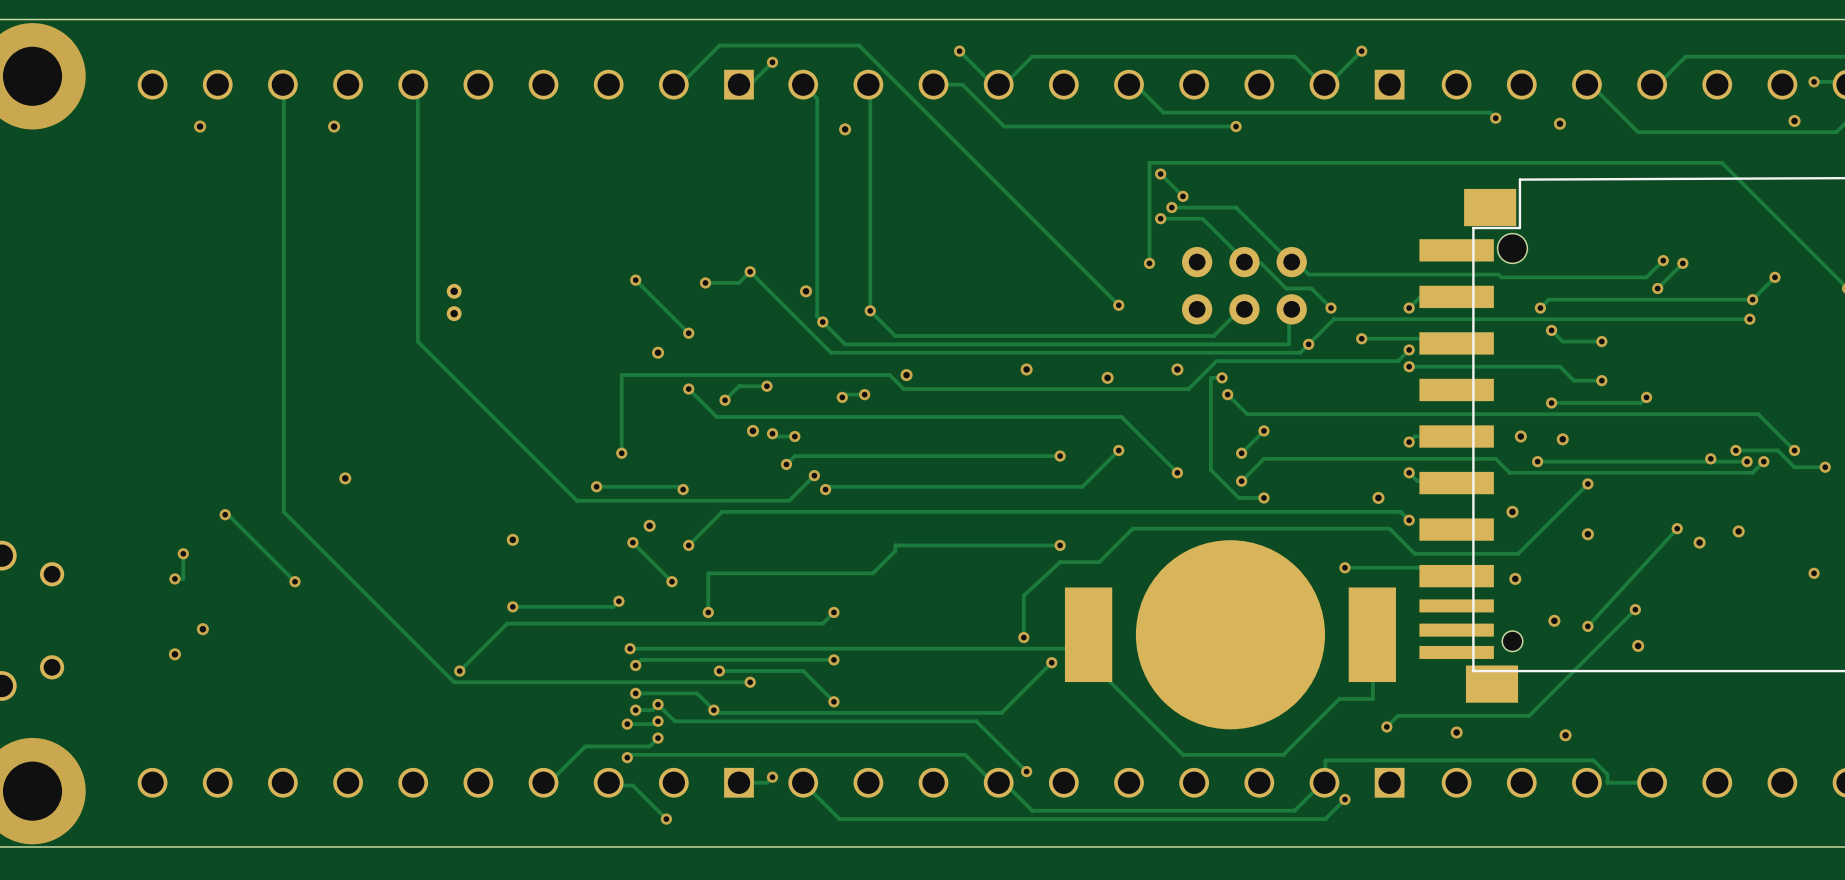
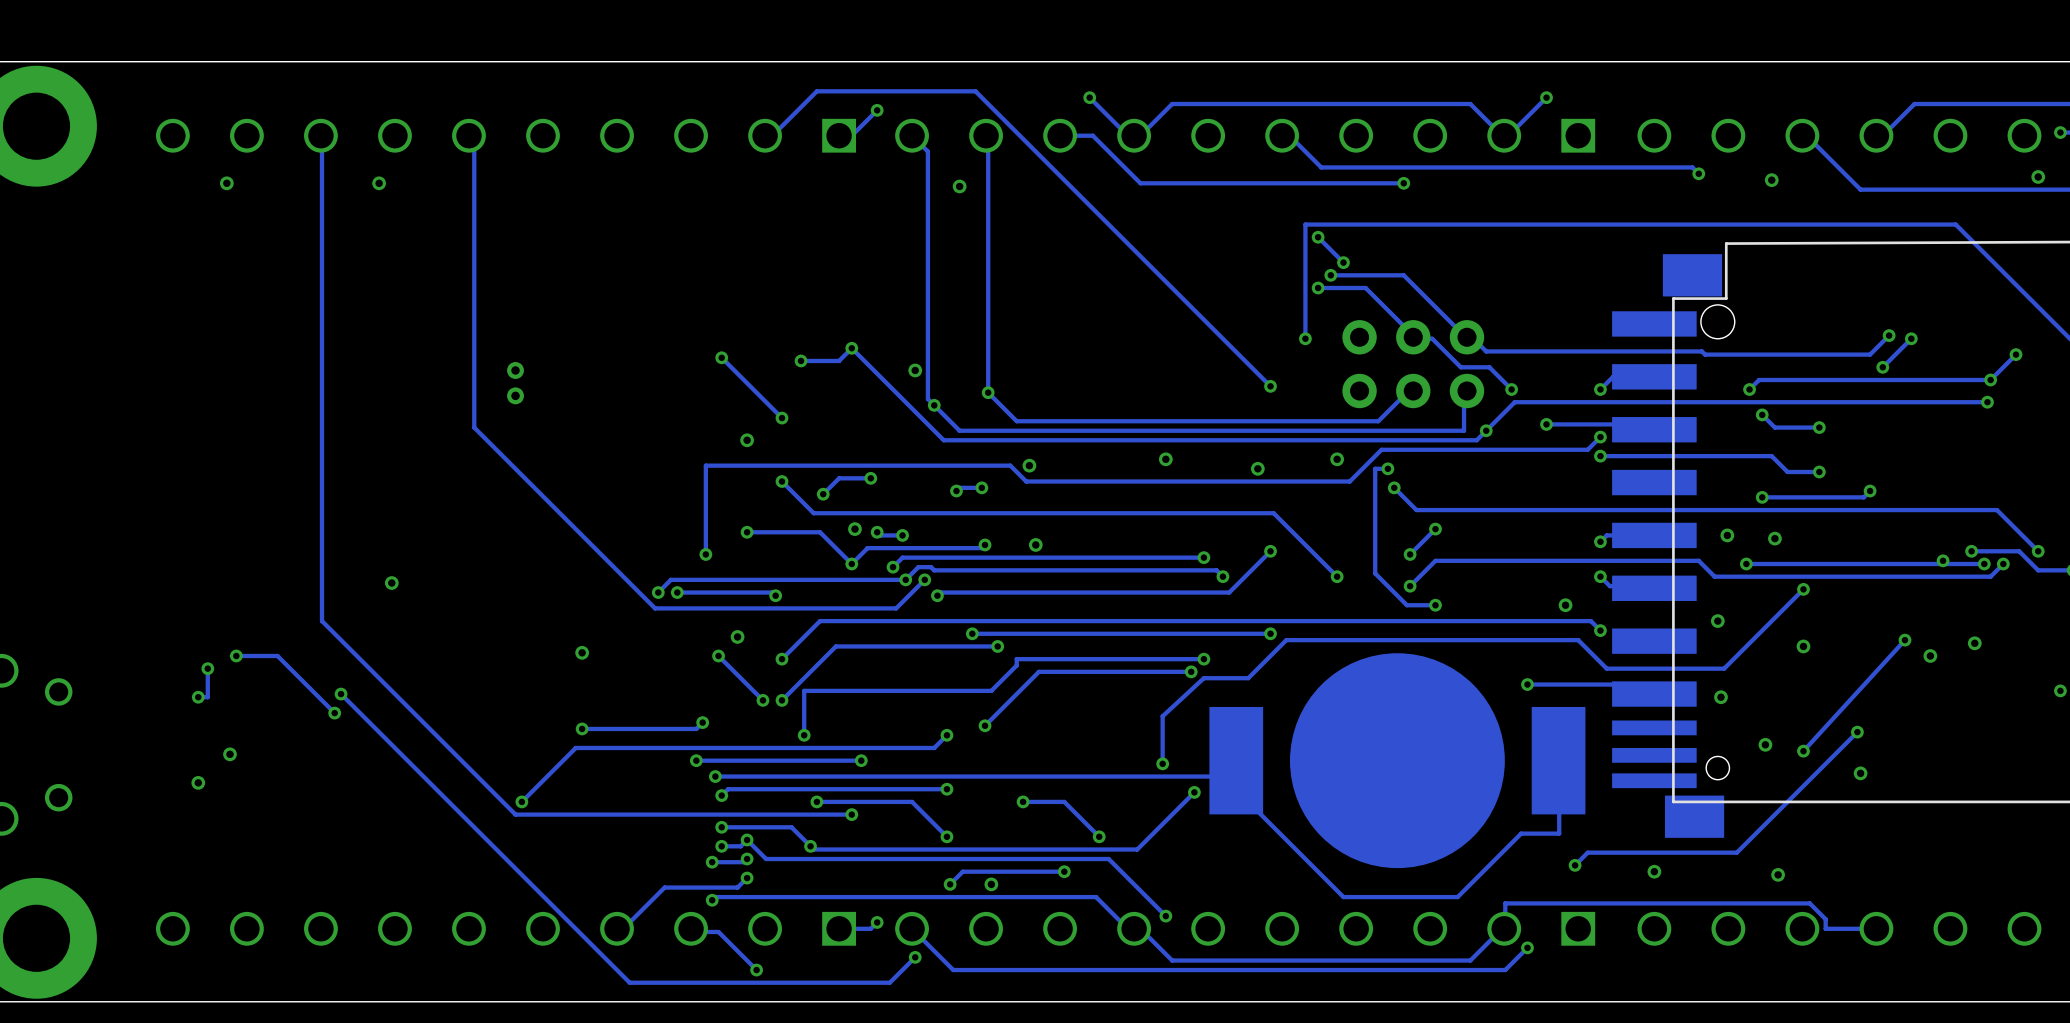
track: none -> (747, 532) (820, 532) (851, 563) (867, 548) (981, 548) (985, 544)
via: none -> (747, 532)
via: none -> (985, 544)
via: none -> (1035, 544)
via: none -> (851, 563)
track: none -> (1222, 576) (1216, 570) (934, 570) (931, 567) (918, 567) (905, 579) (670, 579) (658, 592)
via: none -> (1222, 576)
via: none -> (905, 579)
via: none -> (658, 592)
track: (225, 514) (227, 514) (295, 581) -> none
via position: (225, 514) -> (236, 655)
via: none -> (972, 633)
track: none -> (1270, 633) (972, 633)
via: none -> (1270, 633)
track: none -> (997, 646) (835, 646) (781, 700)
via: none -> (997, 646)
track: none -> (236, 655) (277, 655) (334, 713)
track: none -> (1191, 671) (1038, 671) (985, 725)
via: none -> (1191, 671)
track: none -> (341, 694) (629, 982) (889, 982) (915, 957)
via: none -> (341, 694)
via: (295, 581) -> none
via: none -> (781, 700)
via: none -> (334, 713)
via: none -> (985, 725)
via: none -> (696, 760)
track: none -> (861, 760) (696, 760)
via: none -> (861, 760)
track: none -> (1023, 801) (1064, 801) (1099, 836)
via: none -> (1023, 801)
via: none -> (1099, 836)
track: none -> (1064, 871) (962, 871) (950, 884)
via: none -> (1064, 871)
via: none -> (950, 884)
via: none -> (991, 884)
via: none -> (915, 957)

